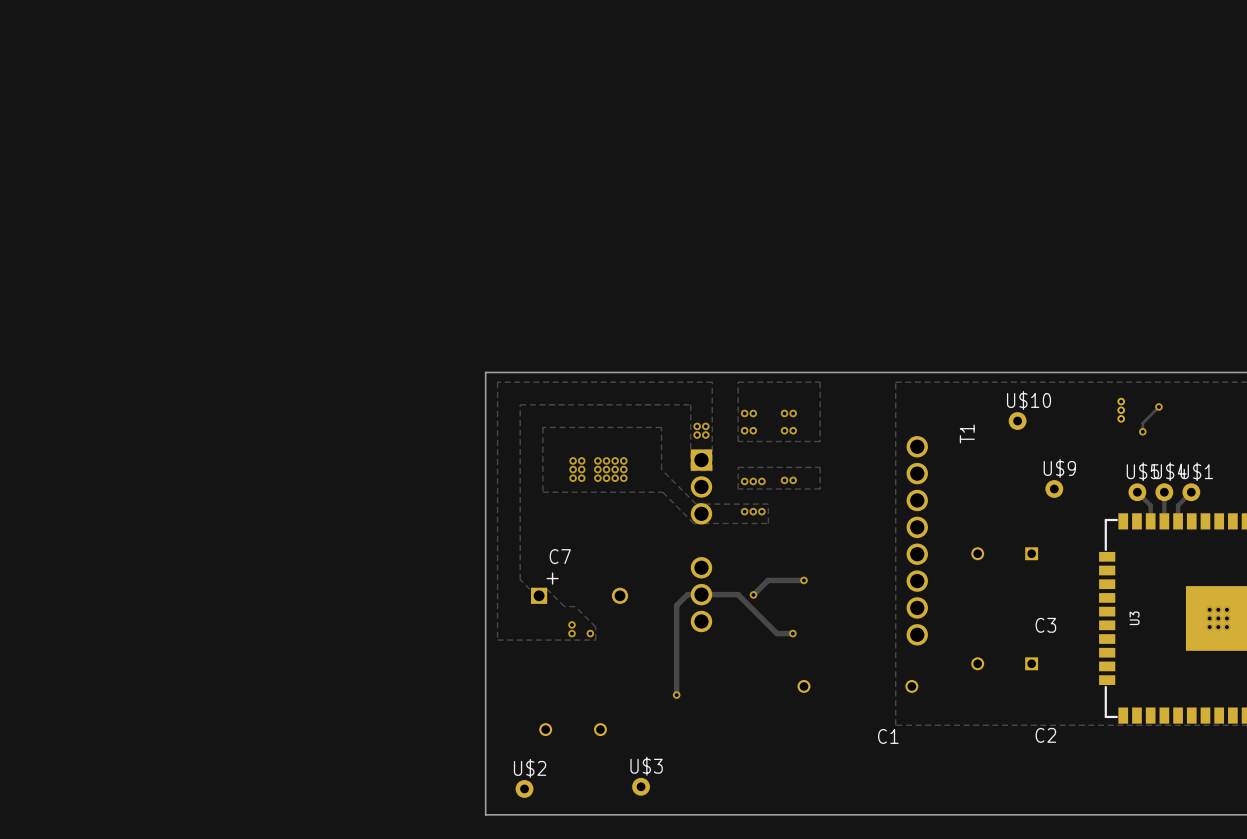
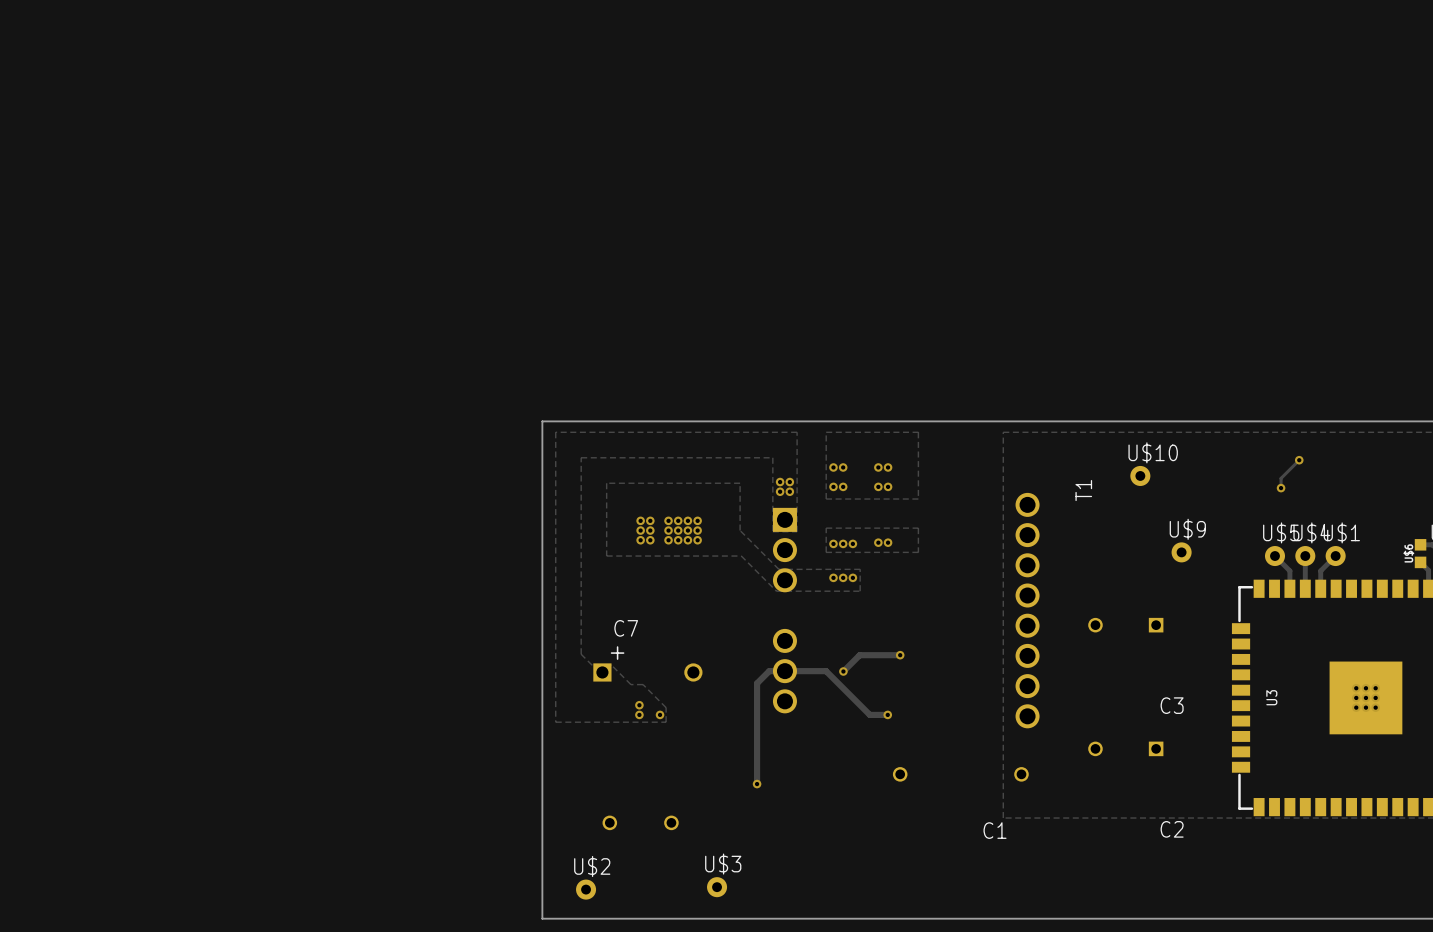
part: (1121, 410) -> none

